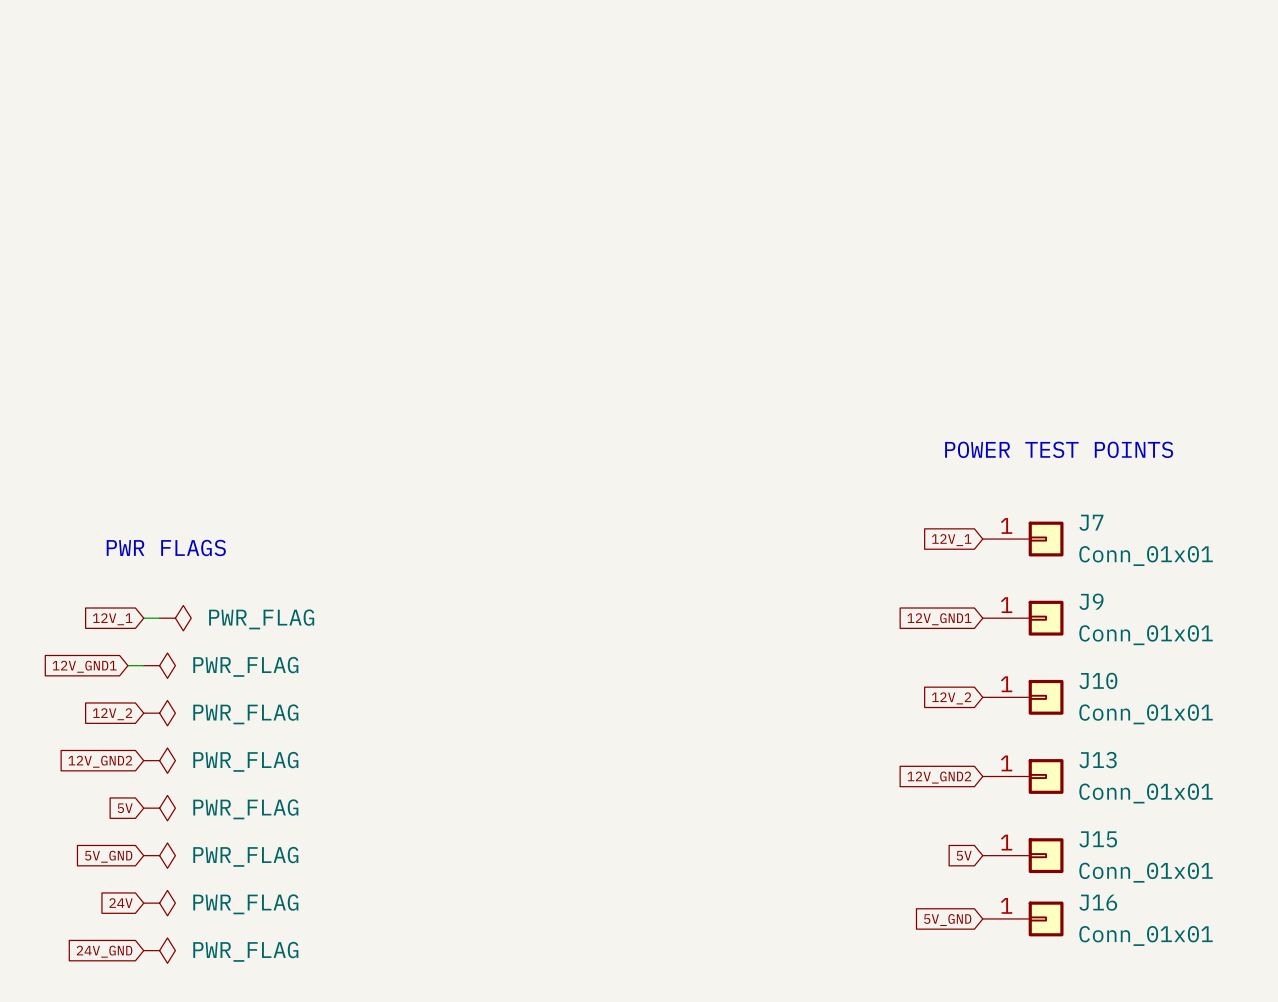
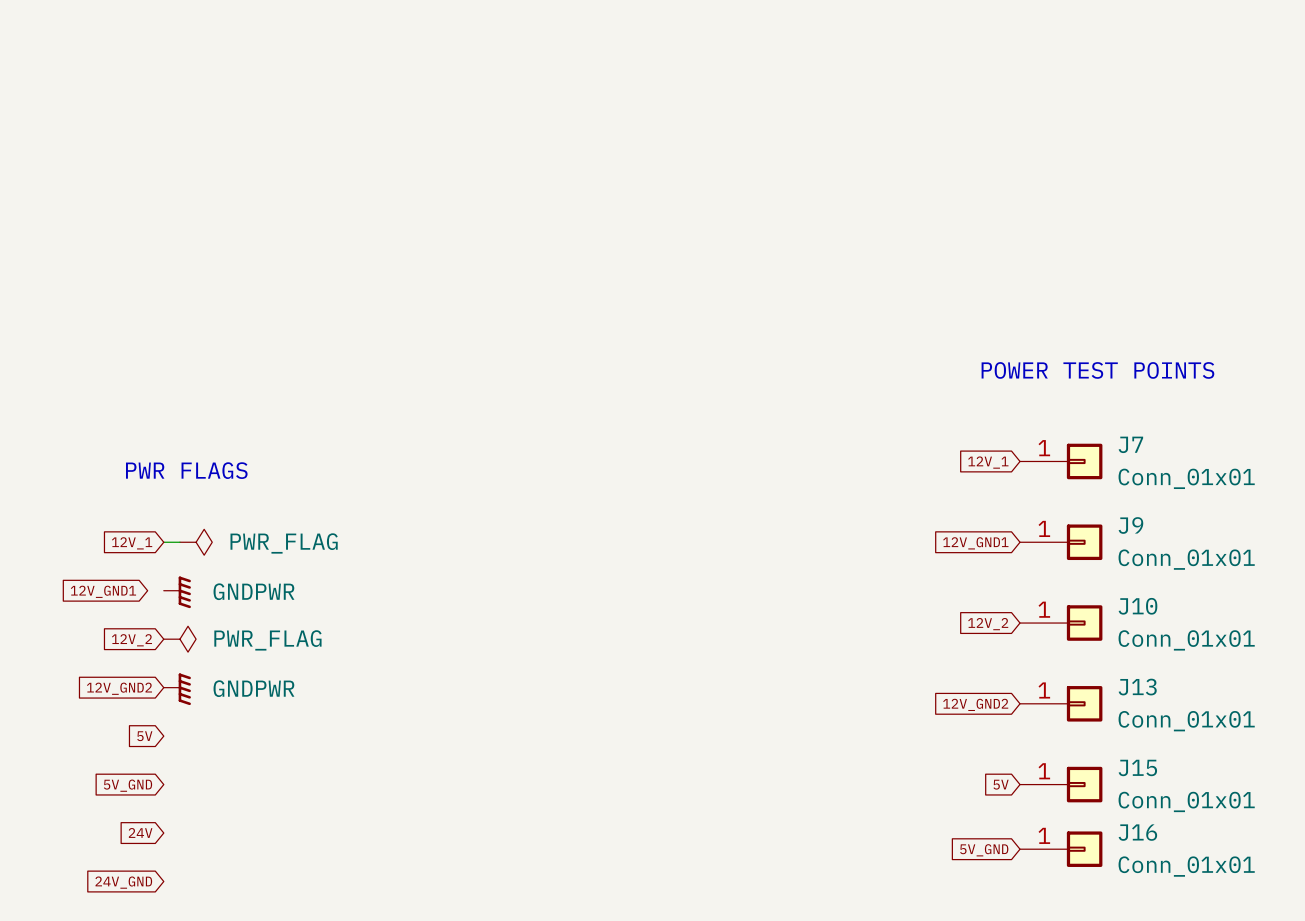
wire: (127, 665) (143, 665) -> none
power symbol: PWR_FLAG (159, 665) -> GNDPWR (177, 592)
power symbol: PWR_FLAG (159, 760) -> GNDPWR (177, 689)
power symbol: PWR_FLAG (159, 808) -> none
power symbol: PWR_FLAG (159, 855) -> none
power symbol: PWR_FLAG (159, 903) -> none
power symbol: PWR_FLAG (159, 950) -> none

